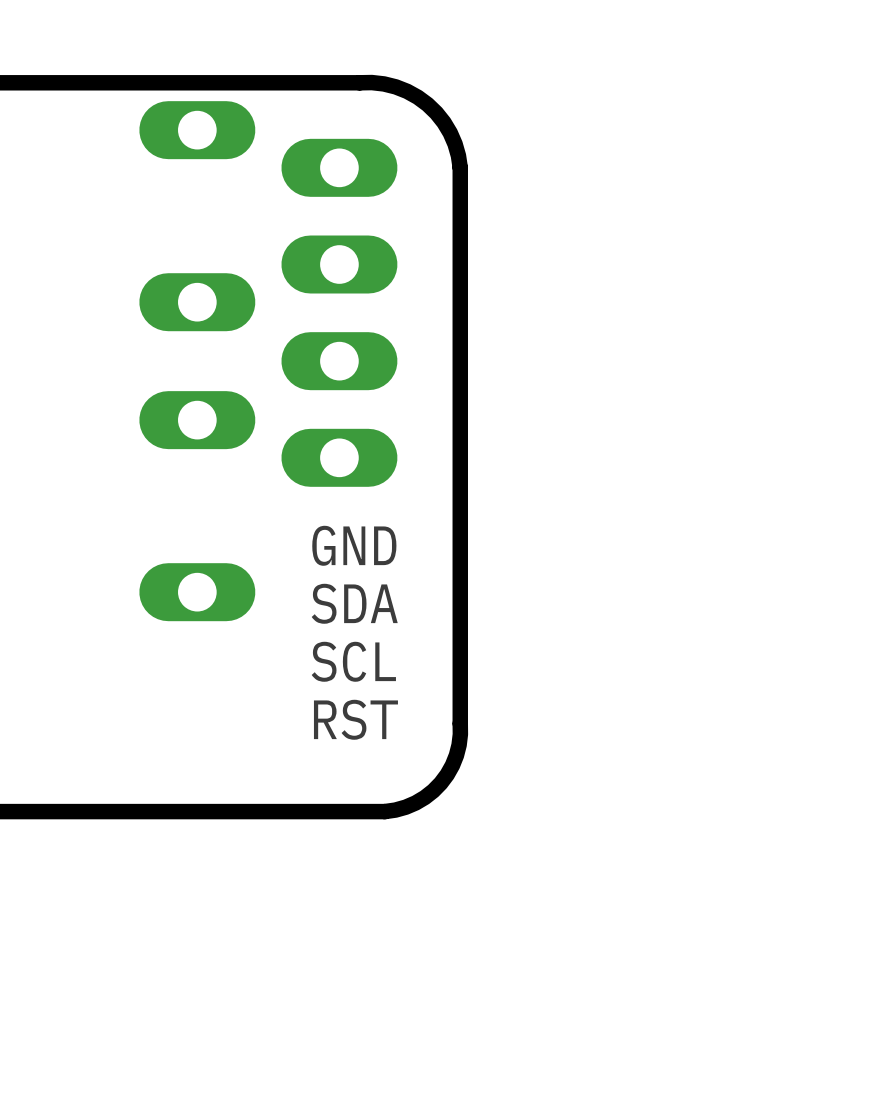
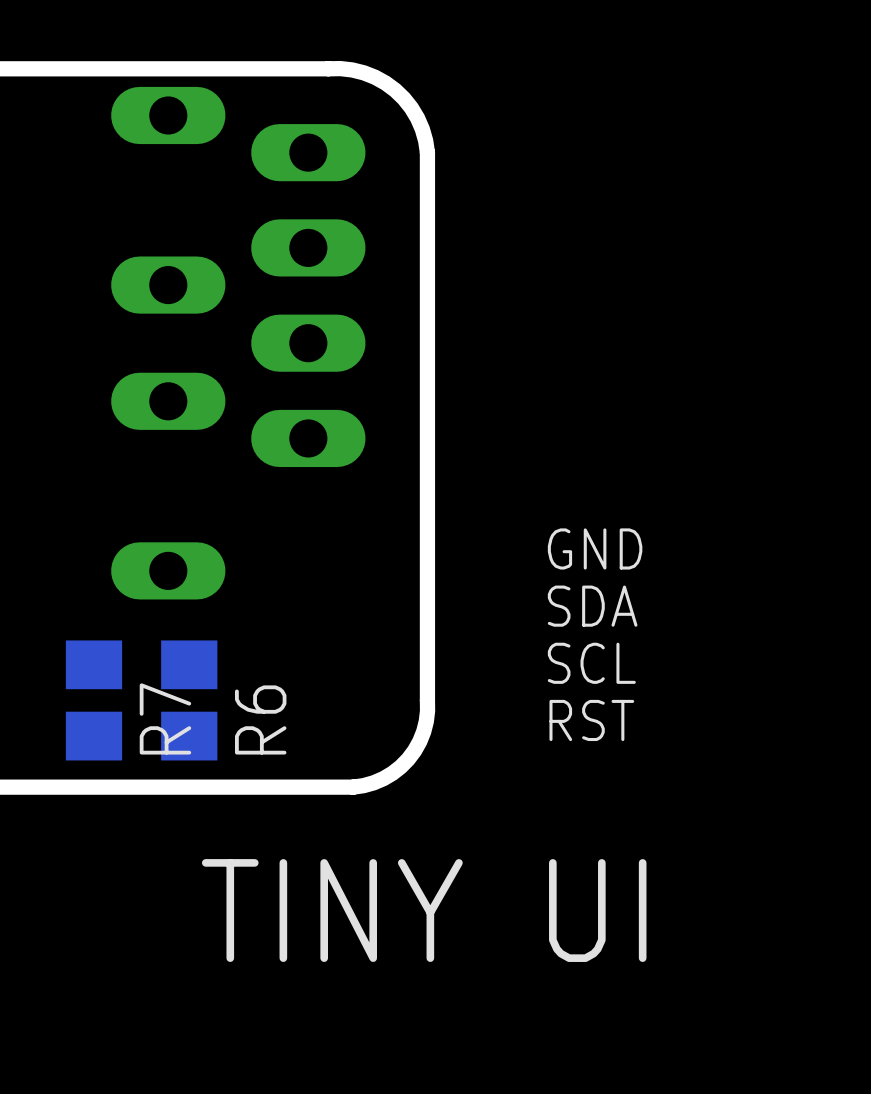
text position: GND (354, 545) -> GND (595, 548)
text position: SDA (354, 603) -> SDA (592, 606)
text position: SCL (353, 661) -> SCL (591, 663)
text position: RST (355, 719) -> RST (591, 720)
R7: none -> (93, 700)
R6: none -> (189, 700)
text: none -> TINY UI (424, 910)

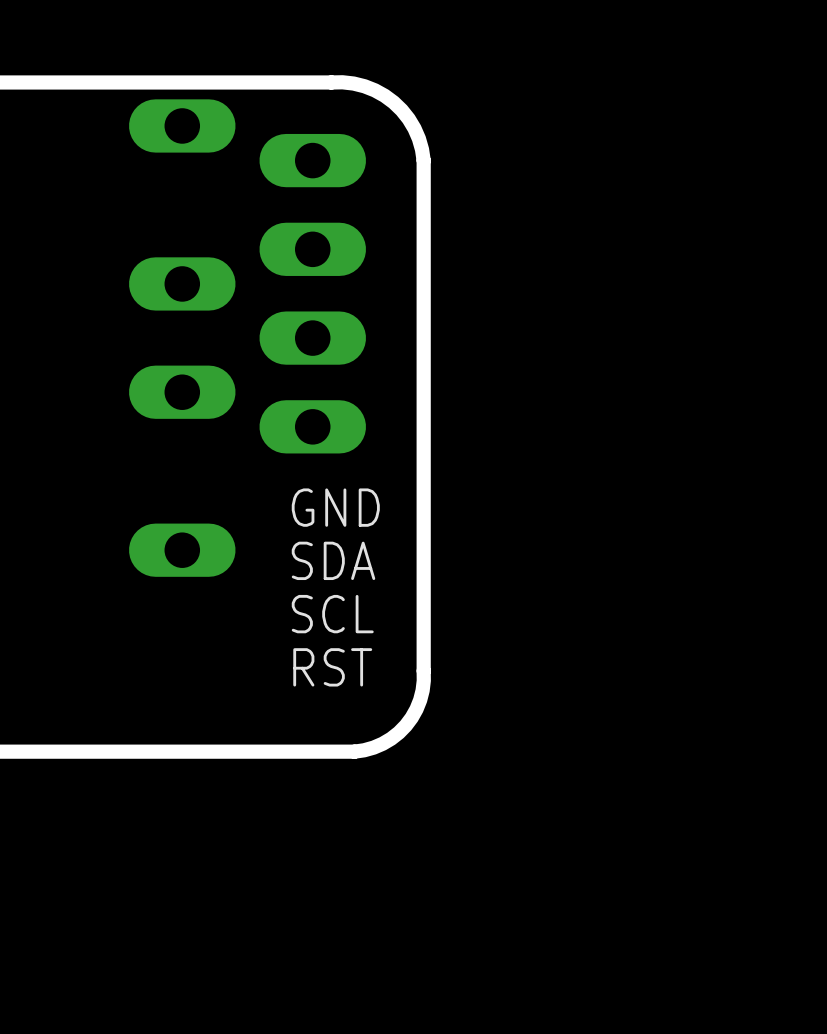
text position: GND (595, 548) -> GND (335, 507)
text position: SDA (592, 606) -> SDA (333, 560)
text position: SCL (591, 663) -> SCL (332, 614)
R7: (93, 700) -> none
R6: (189, 700) -> none
text position: RST (591, 720) -> RST (332, 667)
text: TINY UI (424, 910) -> none

